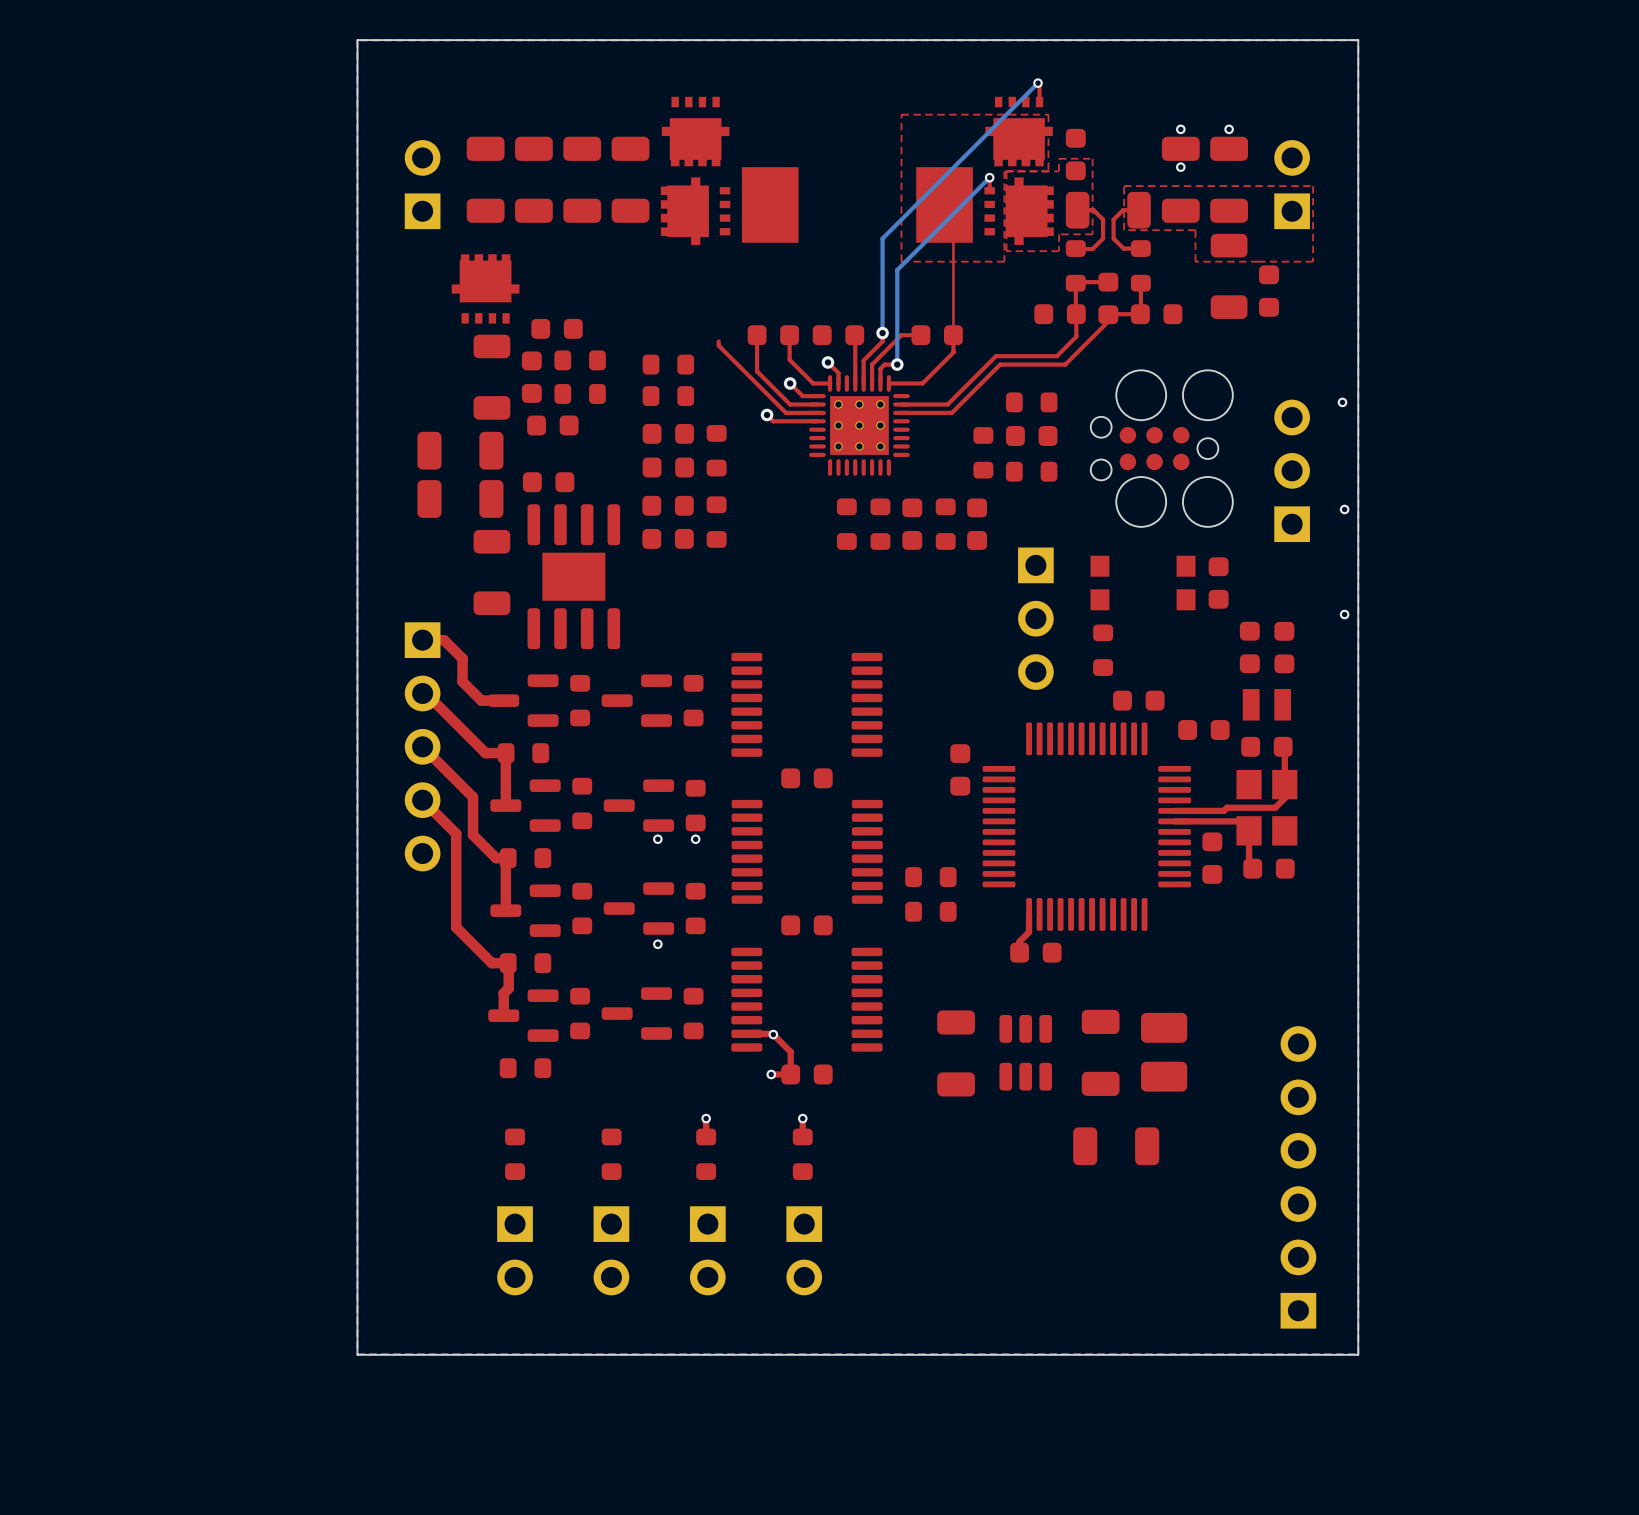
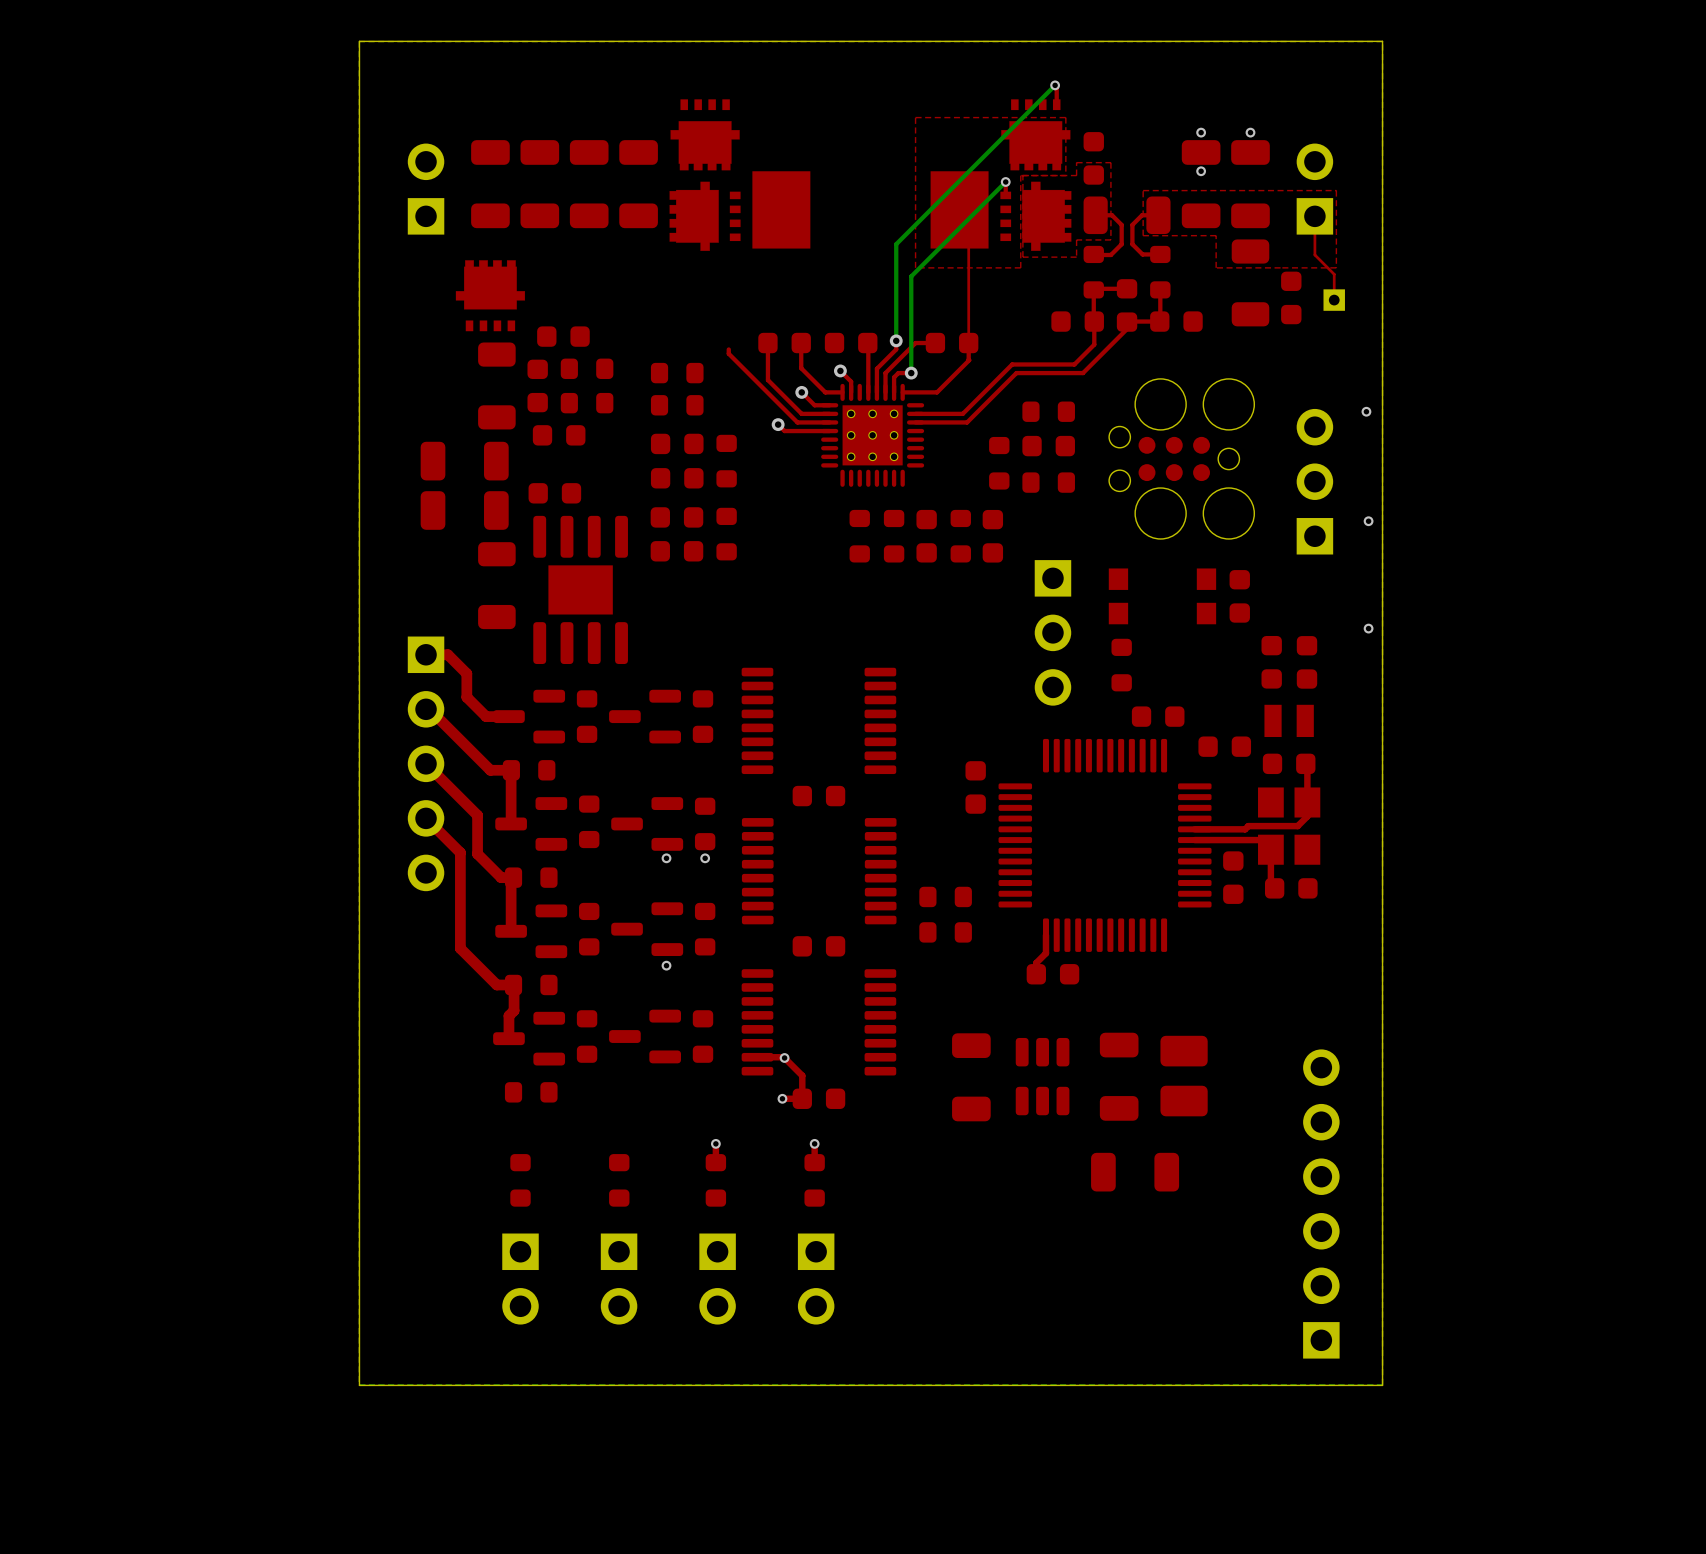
top track: none -> (1314, 216) (1314, 254) (1334, 274) (1334, 300)
part: none -> (1334, 300)

